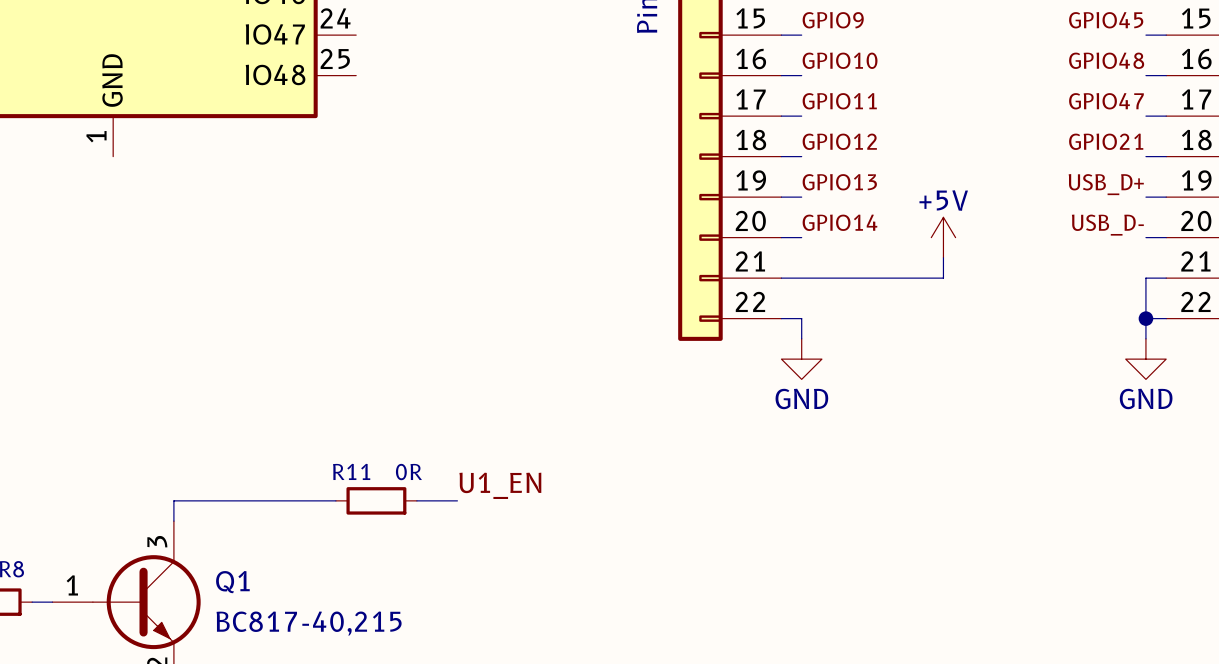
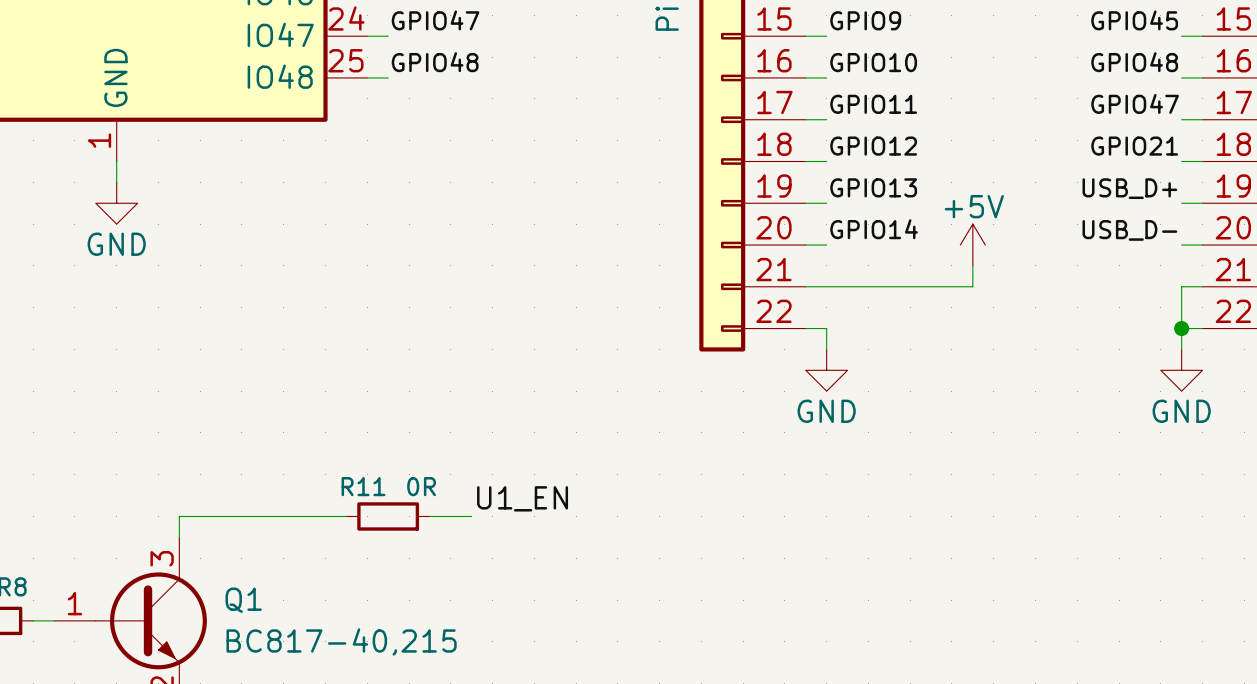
label: none -> GPIO47 (435, 20)
wire: none -> (367, 36) (388, 36)
label: none -> GPIO48 (435, 62)
wire: none -> (367, 77) (388, 77)
wire: none -> (116, 161) (116, 182)
power symbol: none -> GND (116, 203)

